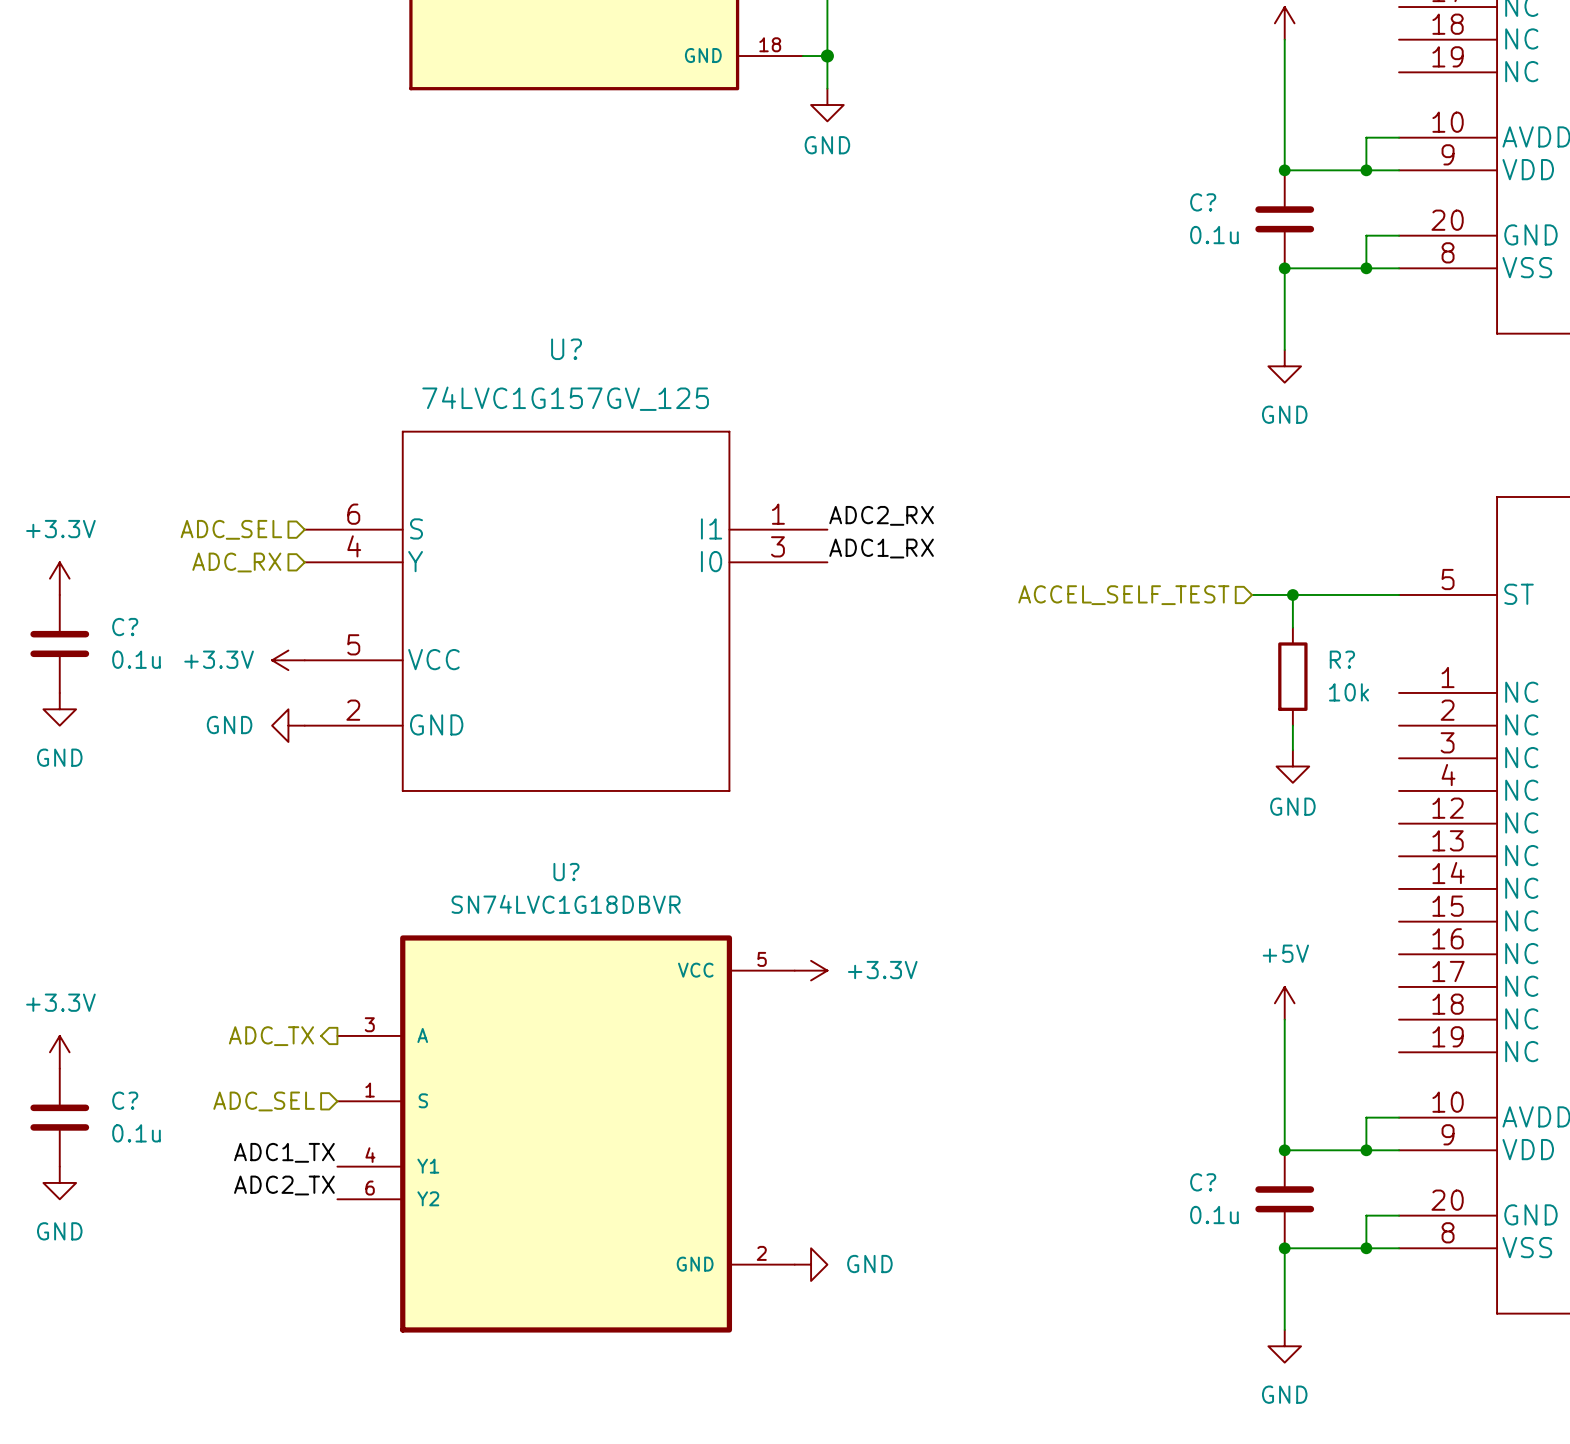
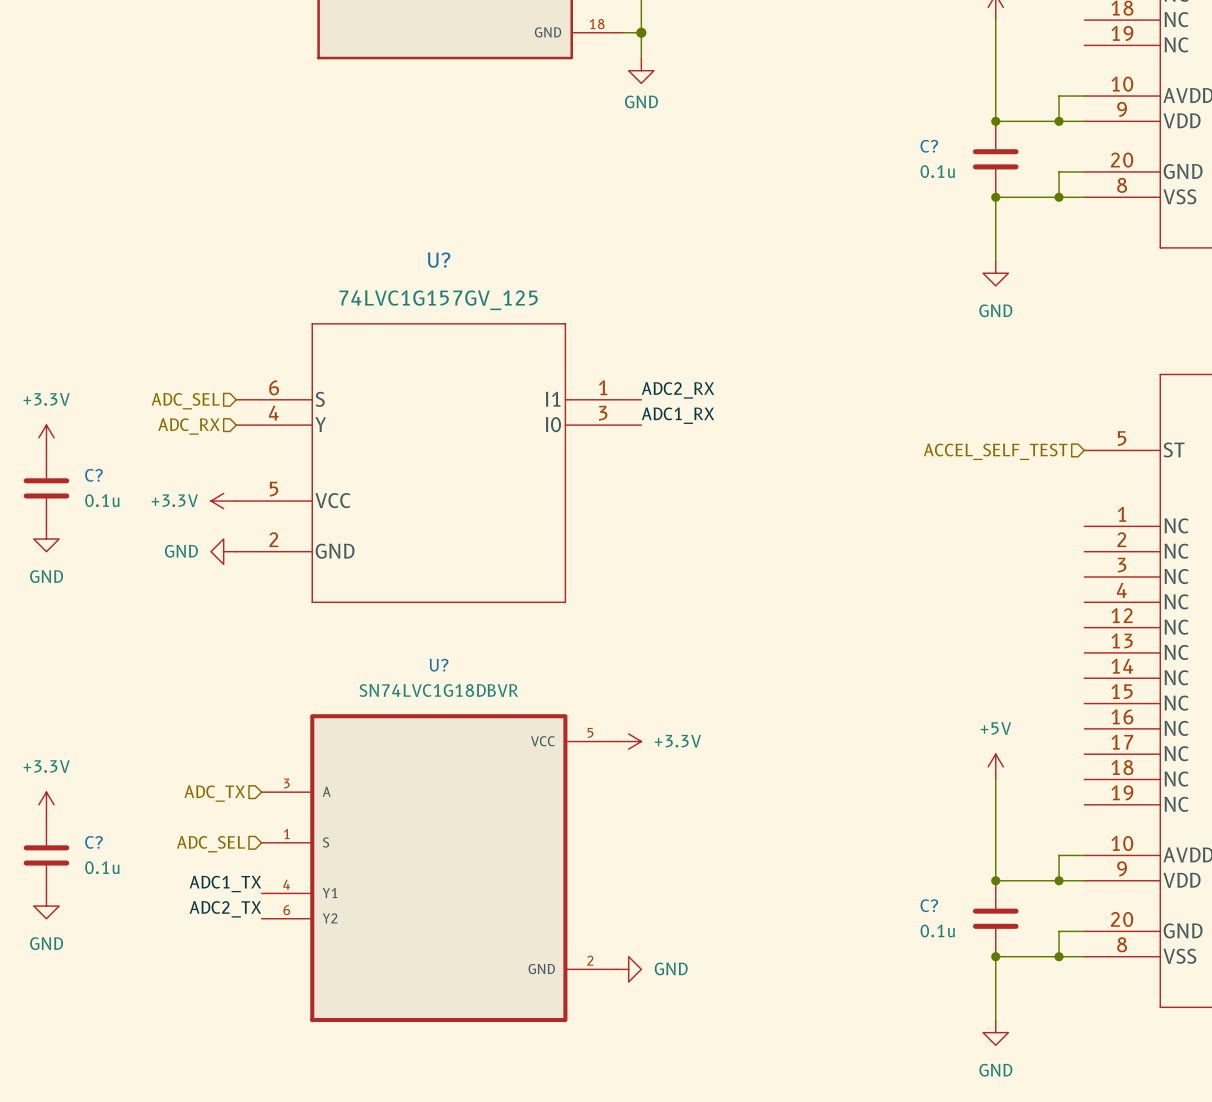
wire: (1252, 594) (1399, 594) -> none
wire: (1292, 594) (1292, 627) -> none
junction: (1292, 594) -> none
hierarchical label position: ACCEL_SELF_TEST (1123, 595) -> ACCEL_SELF_TEST (995, 451)
R?: 10k (1292, 676) -> none
wire: (1292, 725) (1292, 750) -> none
power symbol: GND (1292, 766) -> none
hierarchical label shape: output (271, 1036) -> input (214, 793)

